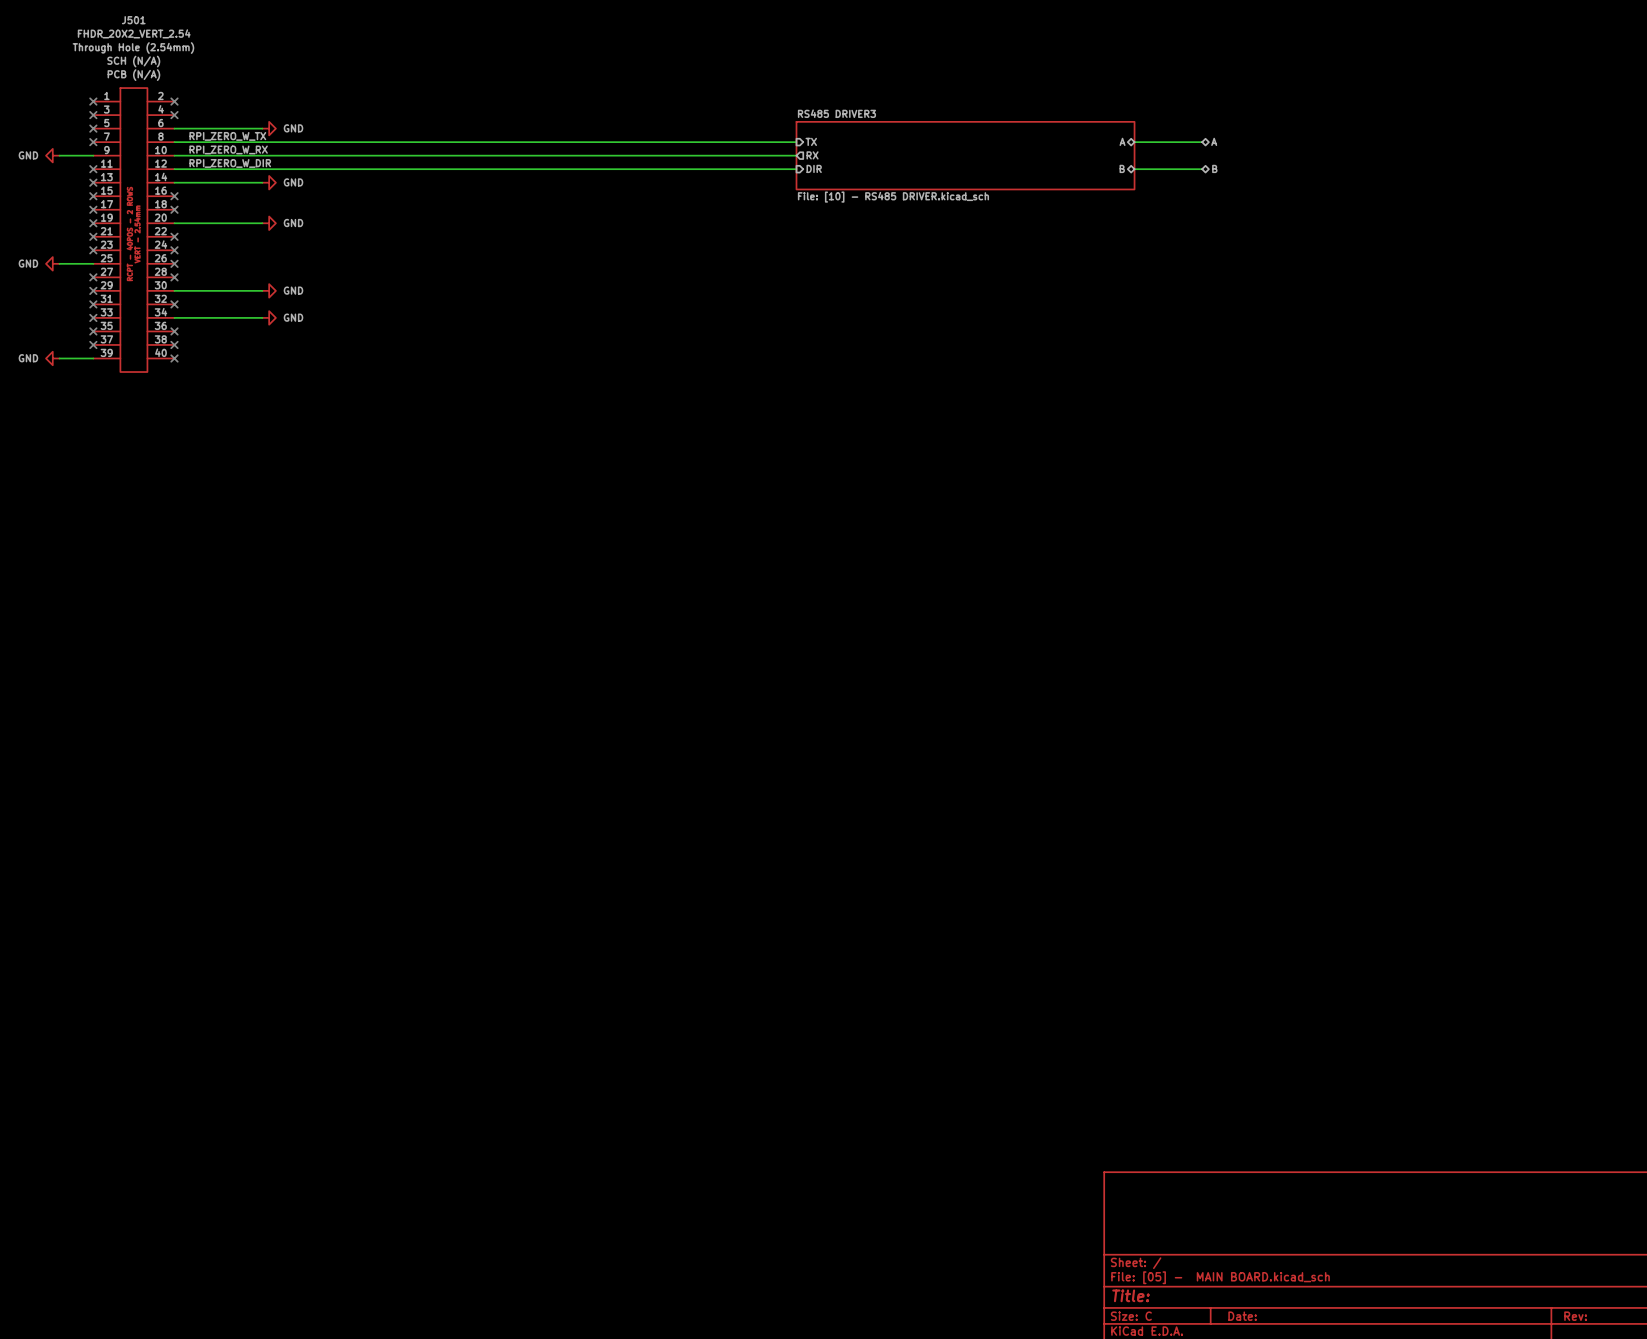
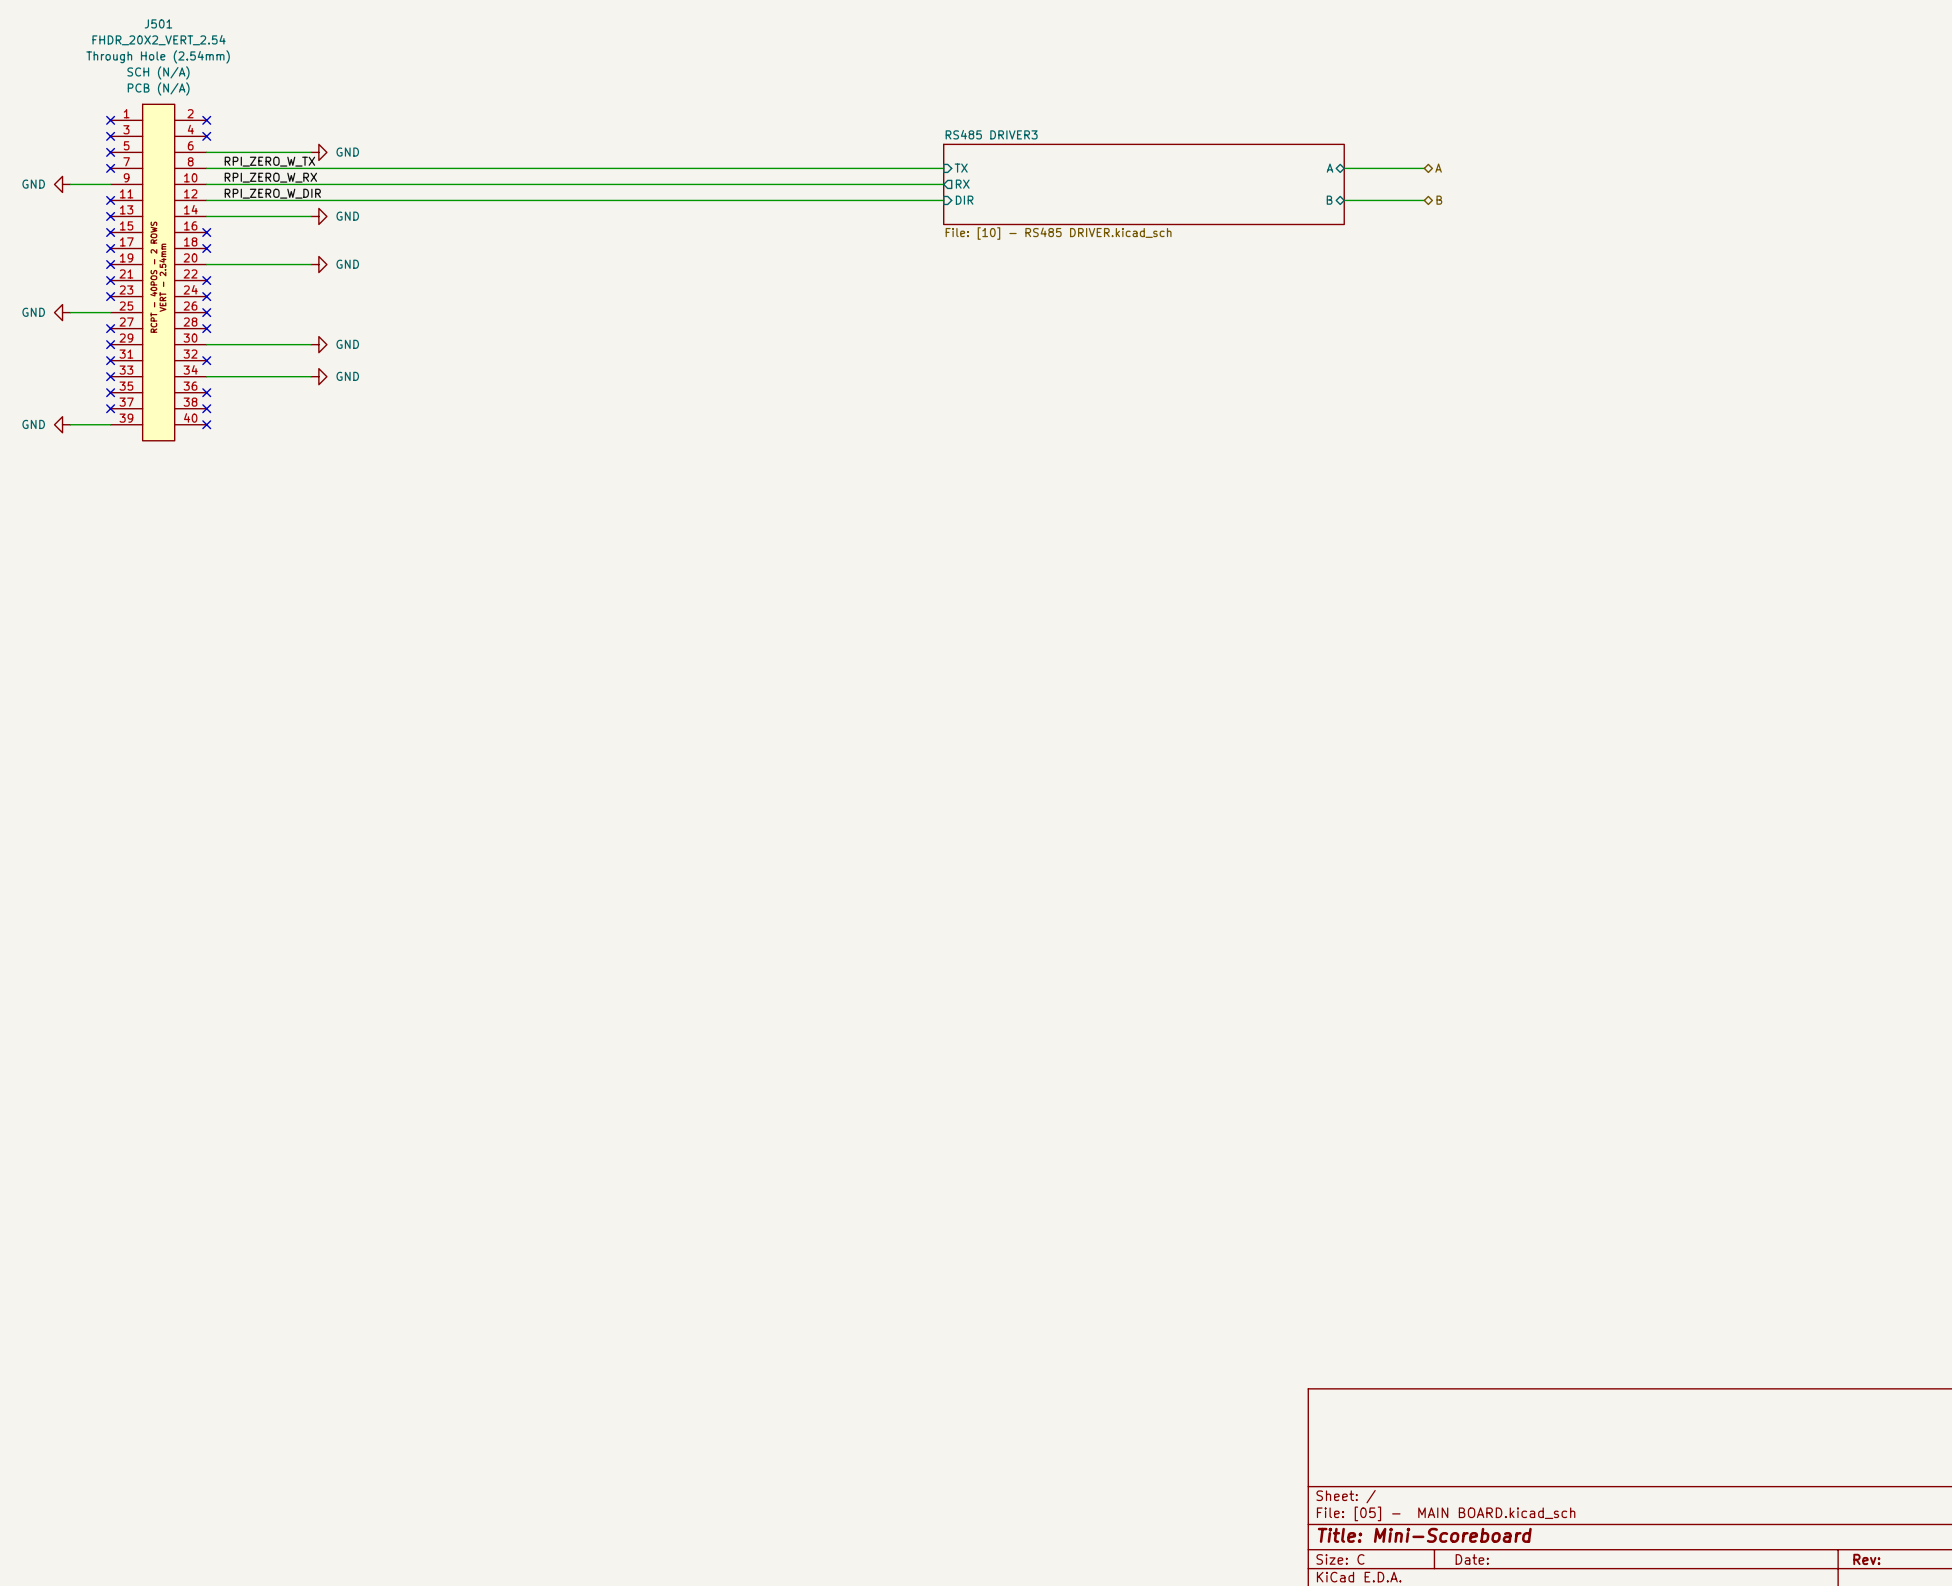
title block: Title: (1130, 1295) -> Title: Mini-Scoreboard (1424, 1535)

